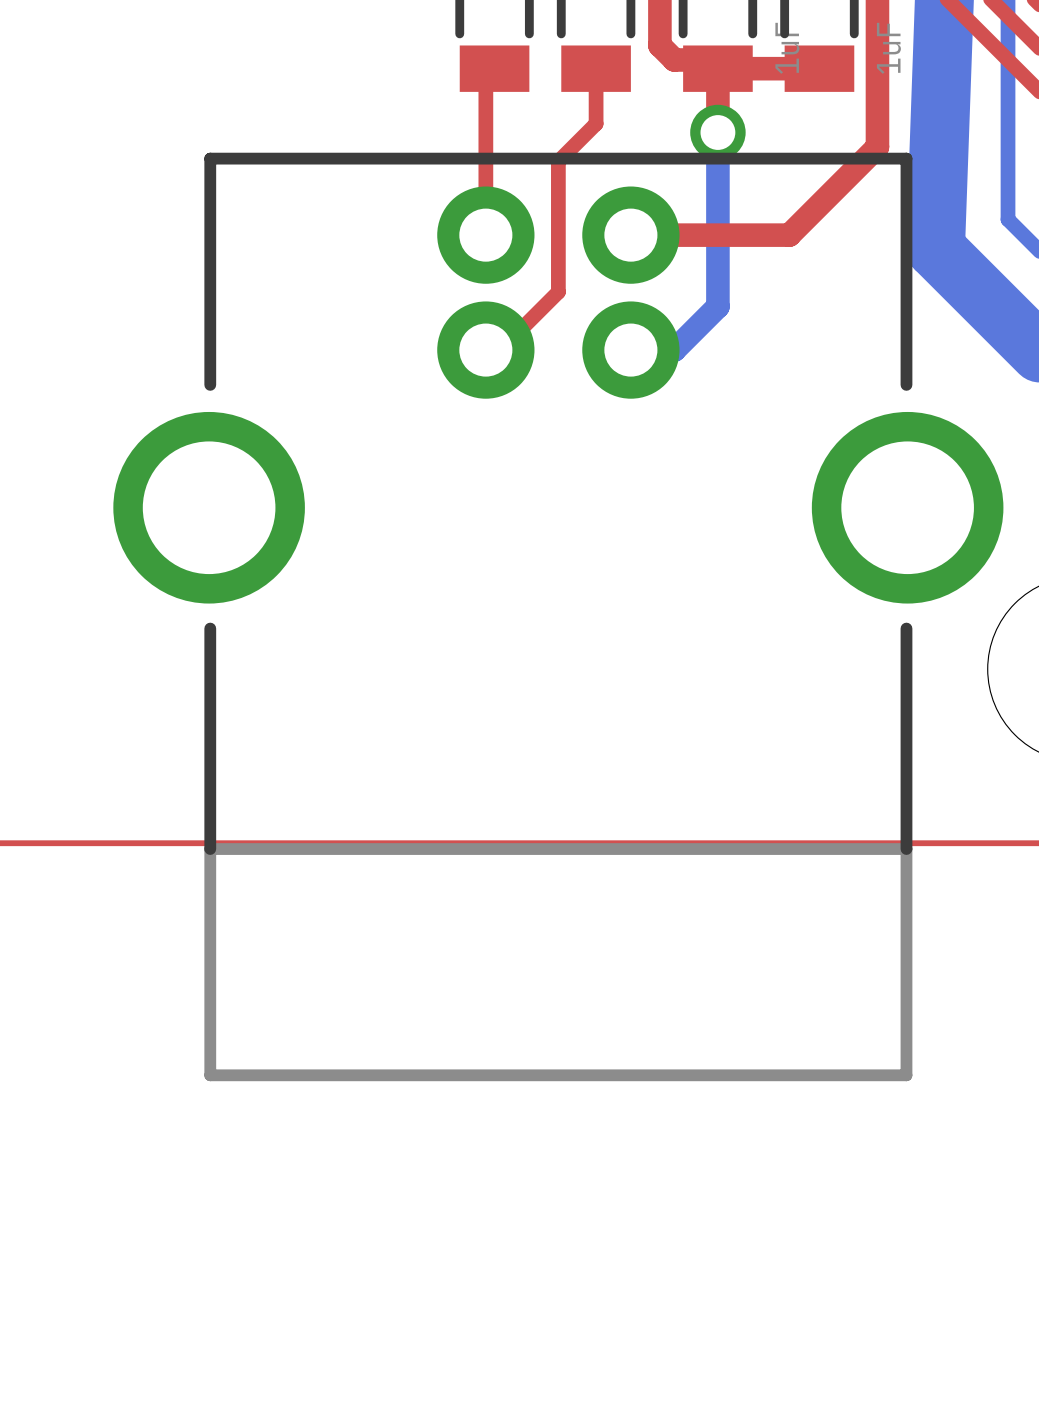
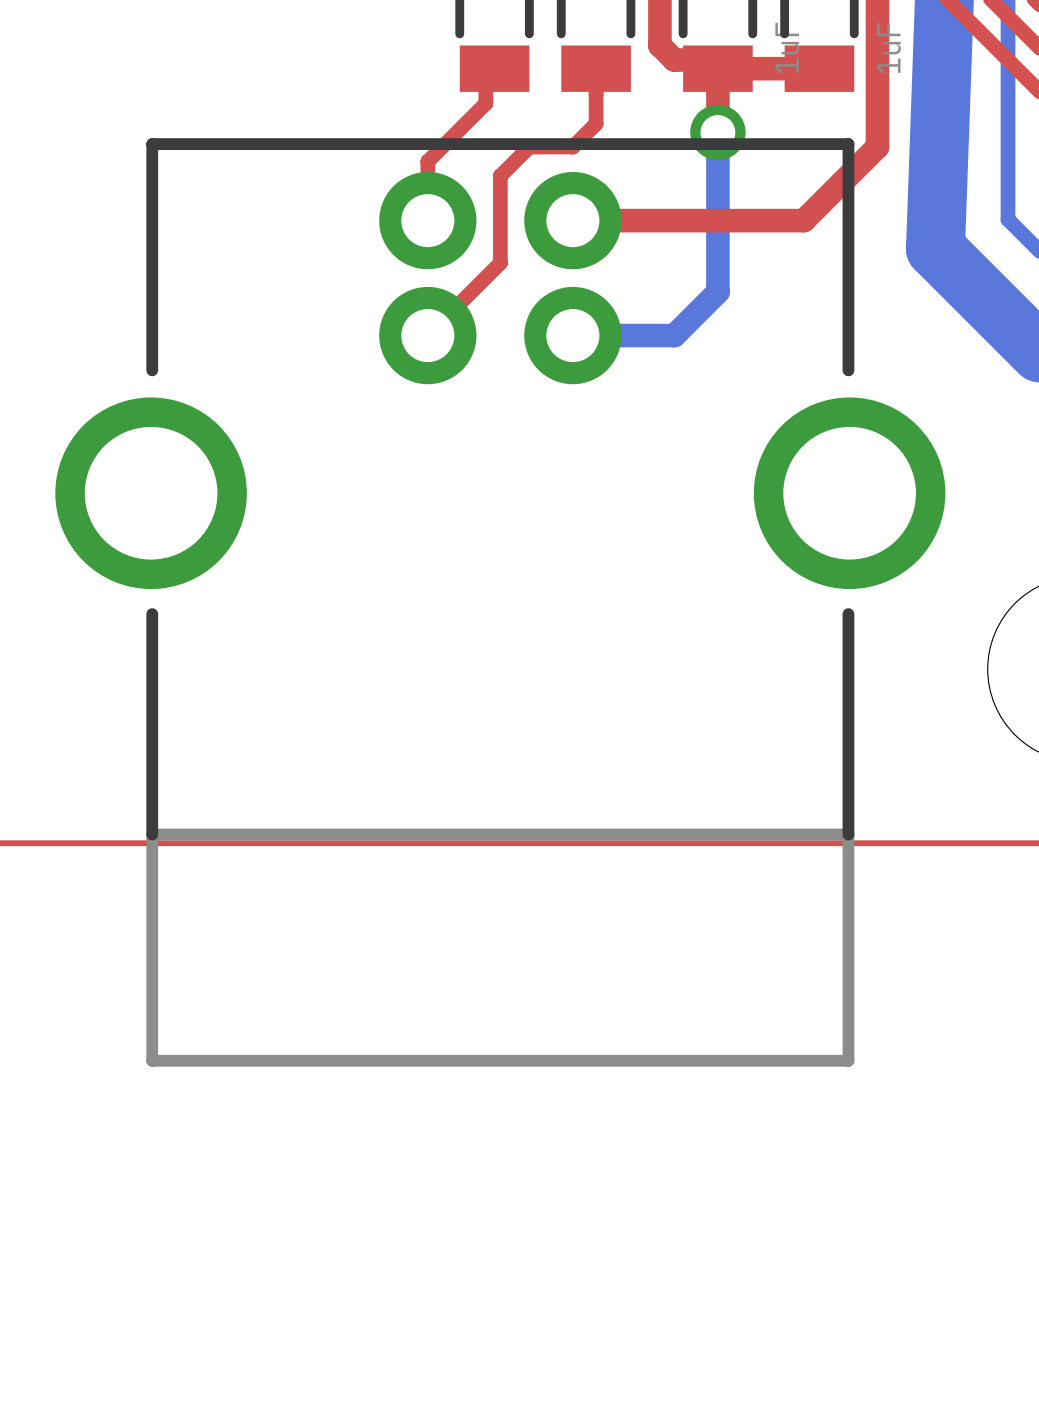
top track: (485, 103) (485, 235) -> (485, 103) (427, 161) (427, 220)
top track: (572, 147) (558, 161) (558, 292) (500, 350) (485, 350) -> (572, 147) (529, 147) (500, 176) (500, 263) (427, 335)
top track: (803, 220) (789, 235) (630, 235) -> (803, 220) (572, 220)
bottom track: (717, 292) (717, 306) (674, 350) (630, 350) -> (717, 292) (674, 335) (572, 335)
part position: (558, 616) -> (500, 602)

